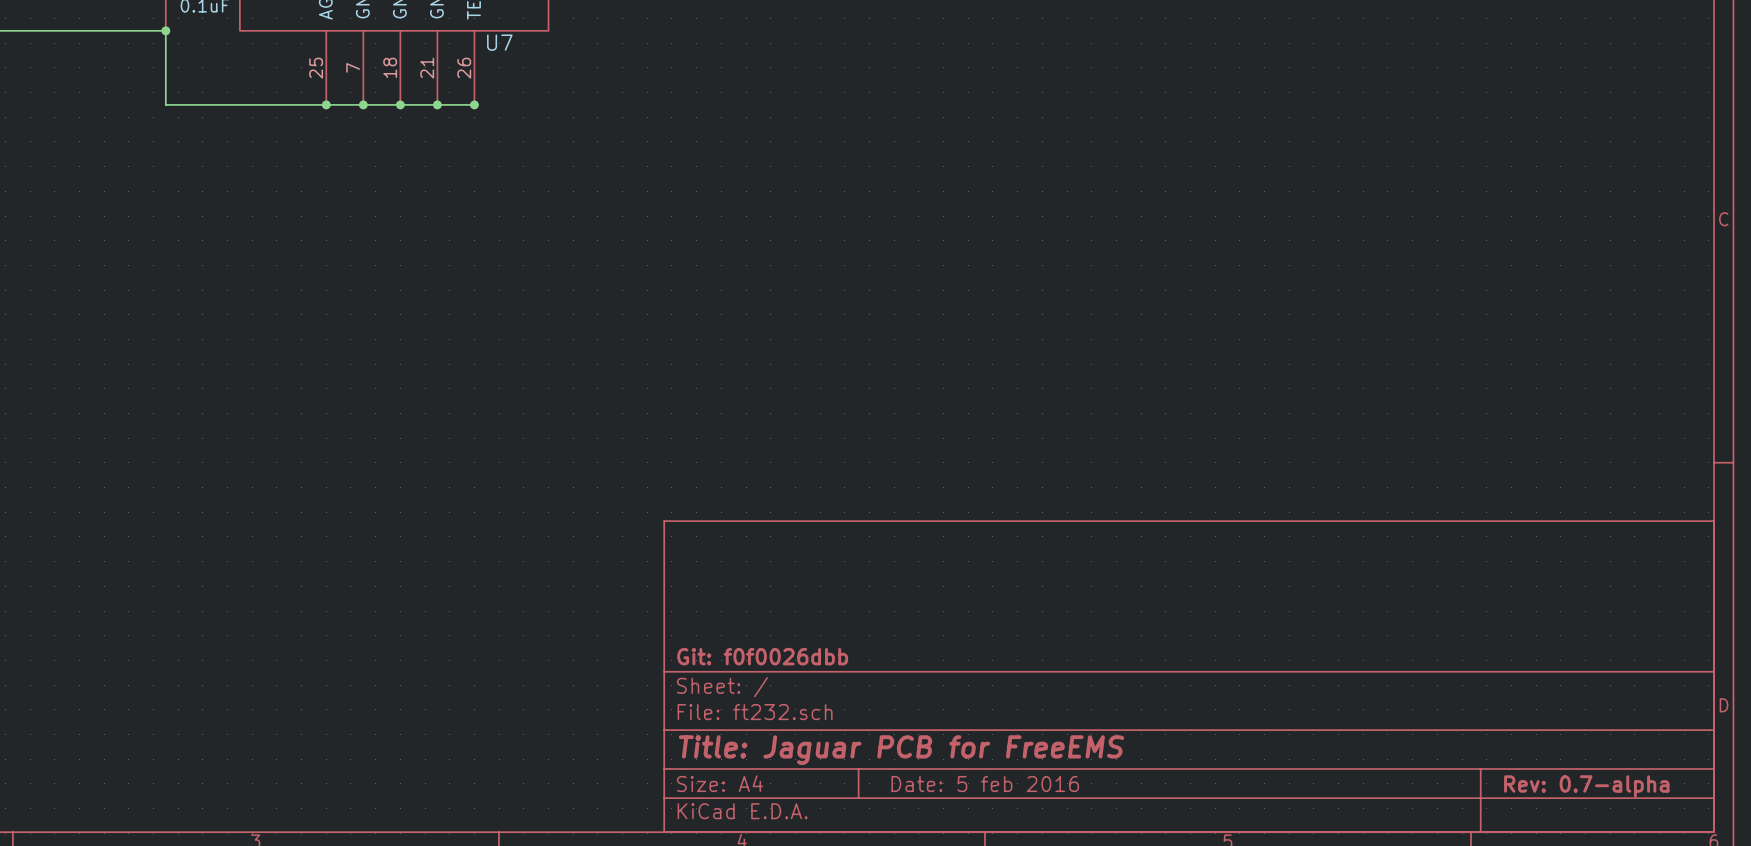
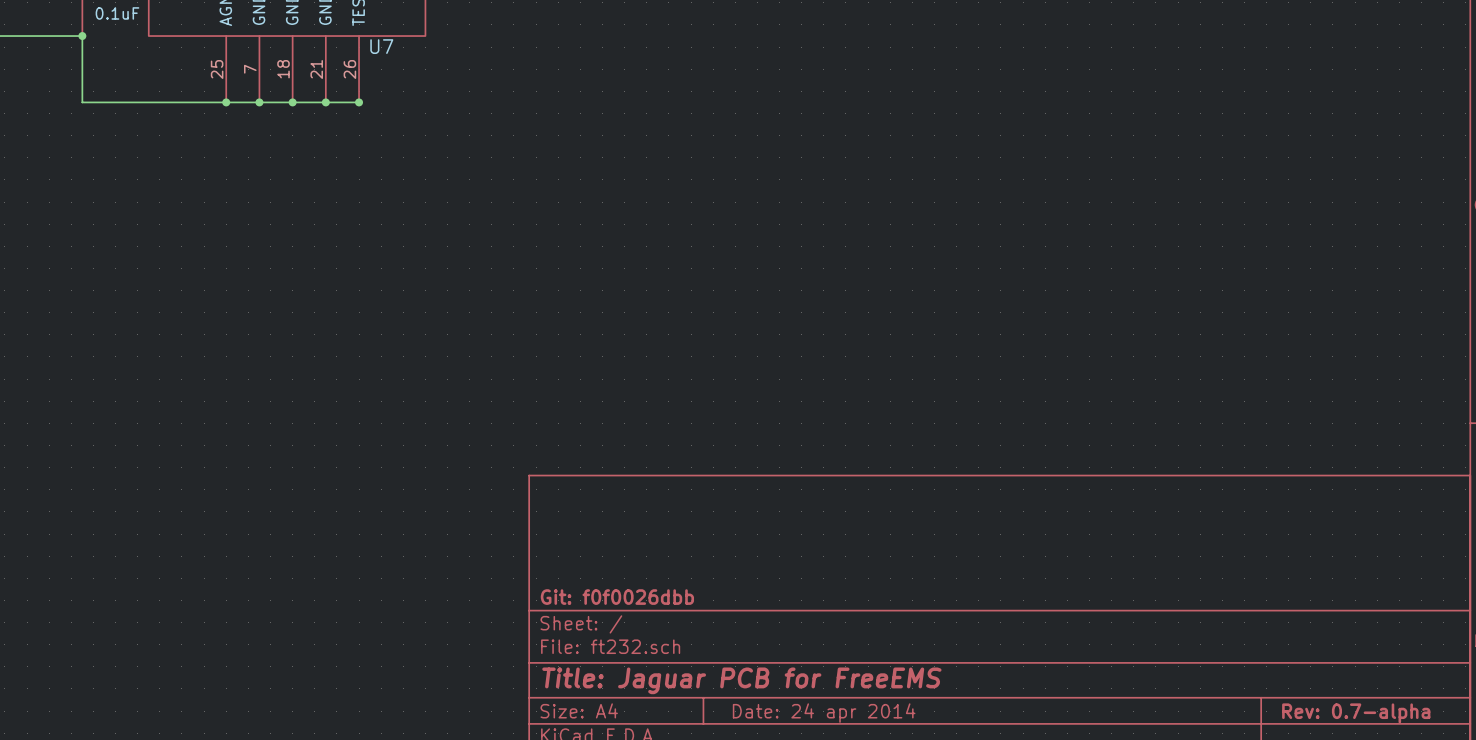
title block: Date: 5 feb 2016 (985, 784) -> Date: 24 apr 2014 (824, 713)

